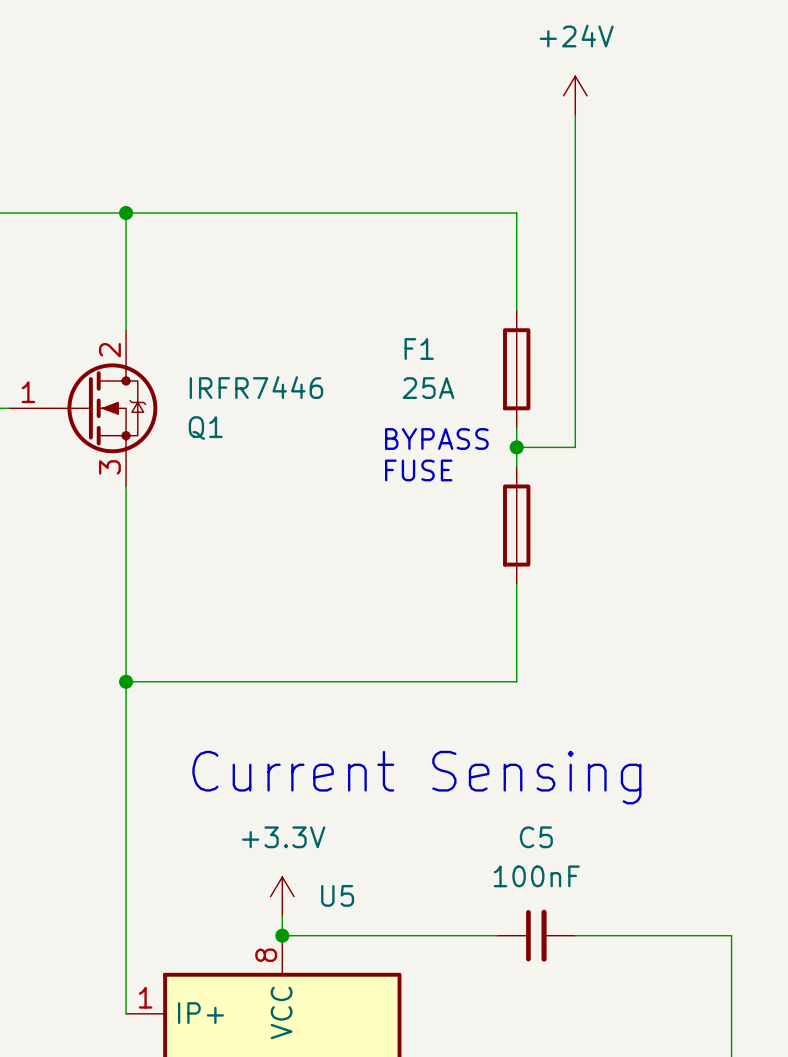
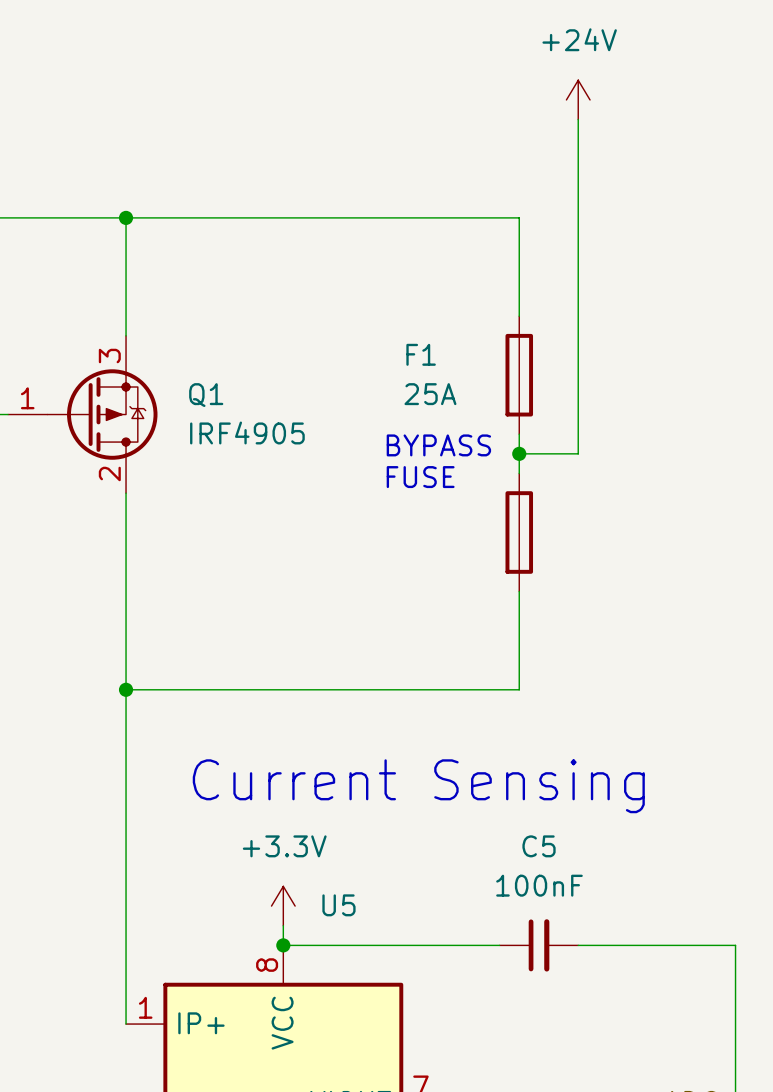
Q1 symbol: [8, 330, 158, 487] -> [8, 335, 158, 494]
Q1 value: IRFR7446 (256, 387) -> IRF4905 (247, 432)
Q1 name position: Q1 (205, 428) -> Q1 (206, 395)

